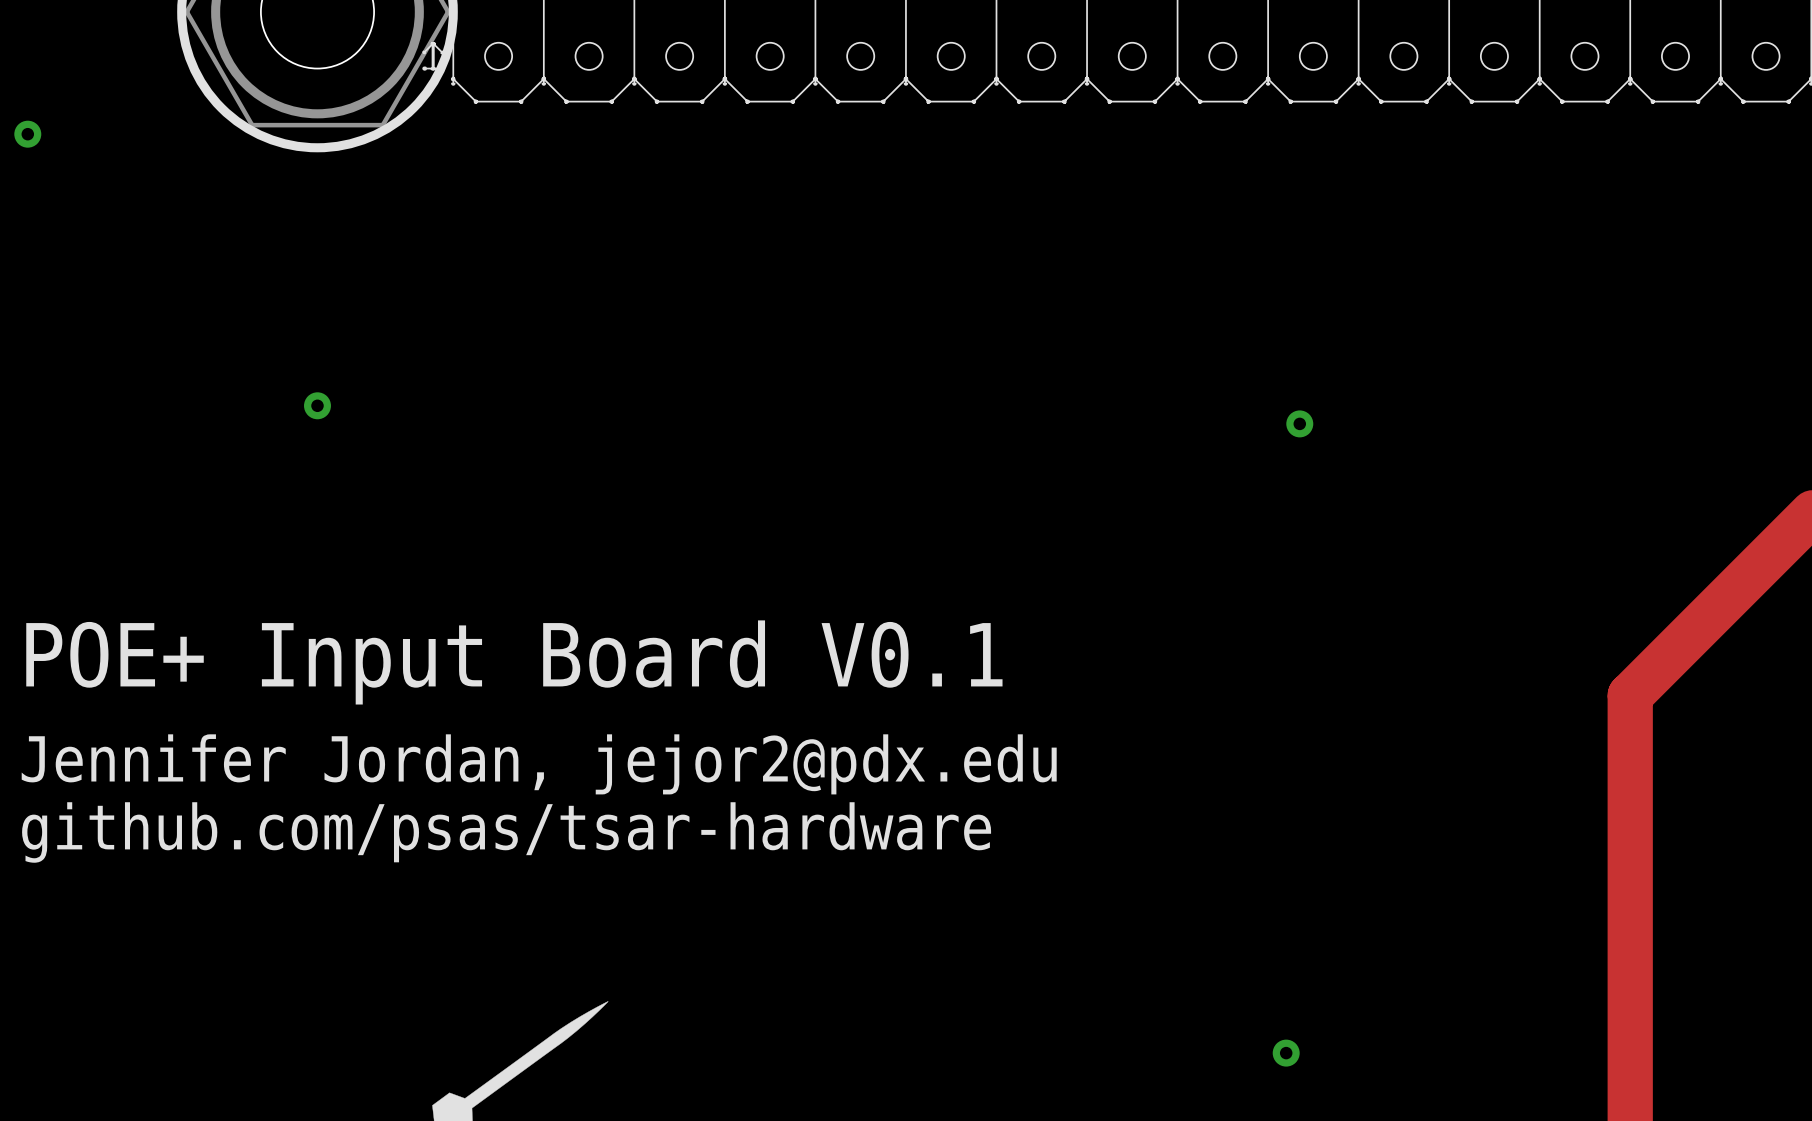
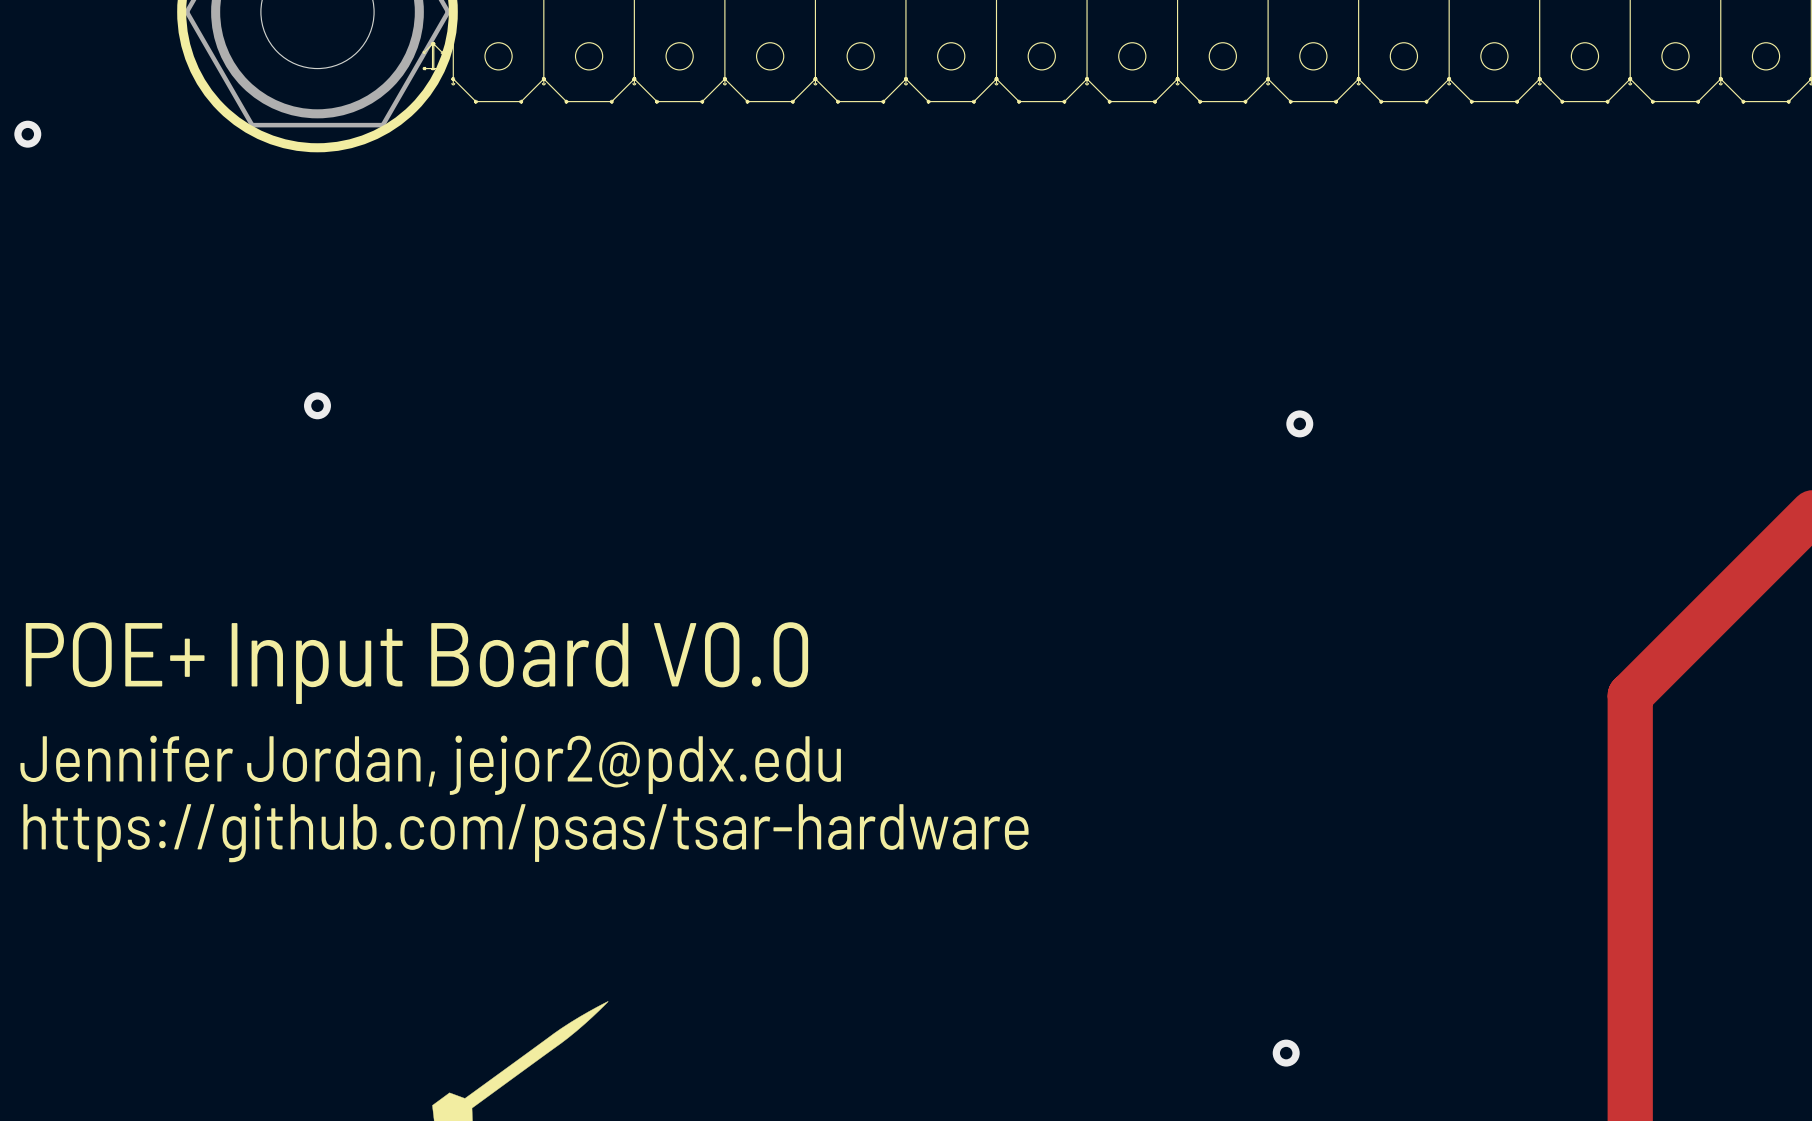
text: POE+ Input Board V0.1 (514, 662) -> POE+ Input Board V0.0 (416, 663)
text: github.com/psas/tsar-hardware (506, 832) -> https://github.com/psas/tsar-hardware (525, 832)

